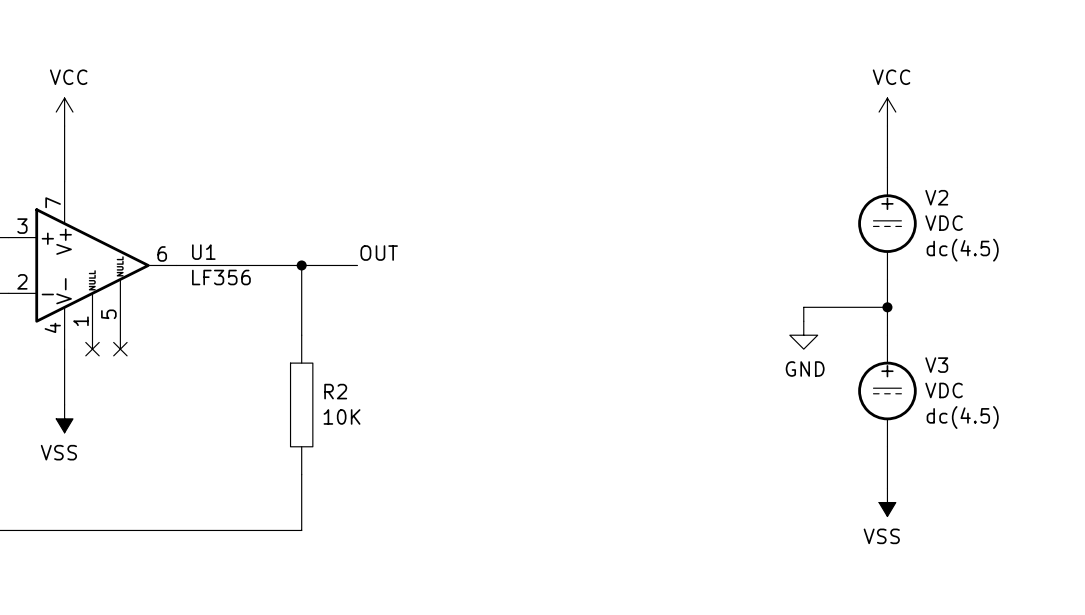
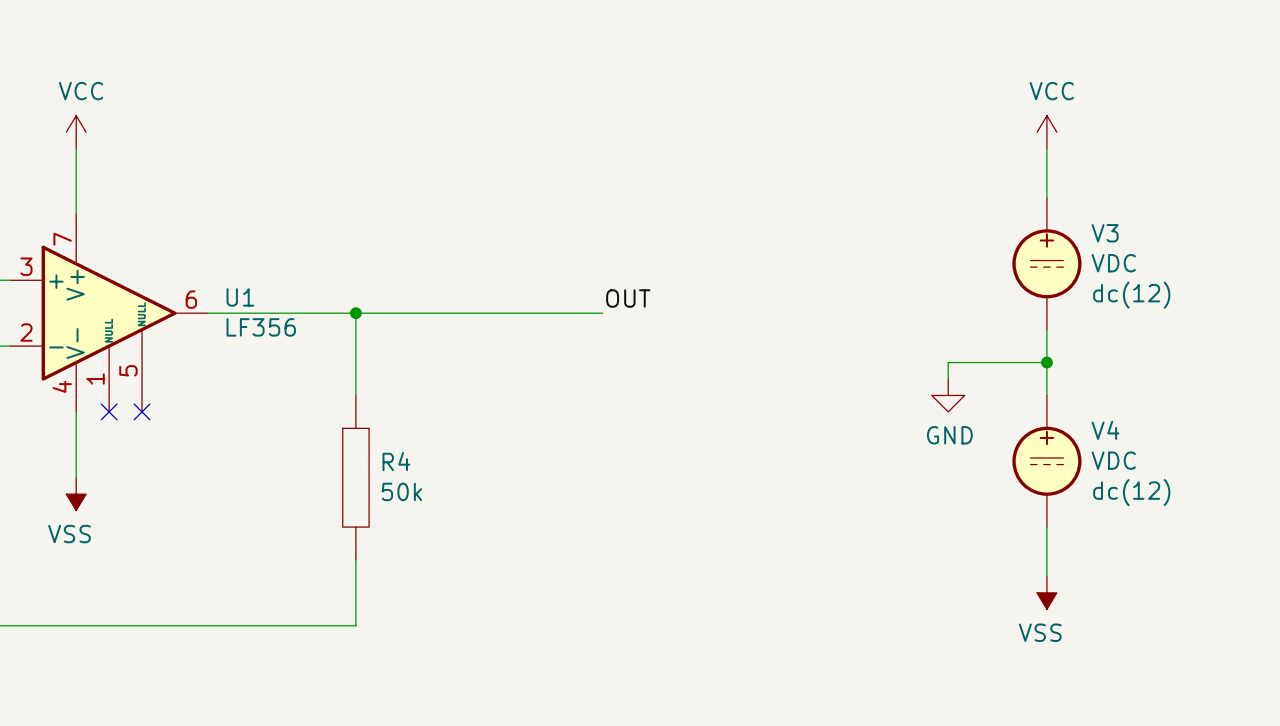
V2 name: V2 (936, 197) -> V3 (1105, 233)
V2 text: dc(4.5) (962, 250) -> dc(12) (1131, 295)
label position: OUT (379, 253) -> OUT (628, 298)
wire: none -> (421, 313) (602, 313)
V3 name: V3 (936, 365) -> V4 (1105, 430)
R2 name: R2 (335, 391) -> R4 (396, 461)
R2 value: 10K (342, 416) -> 50k (401, 491)
V3 text: dc(4.5) (962, 417) -> dc(12) (1131, 492)

